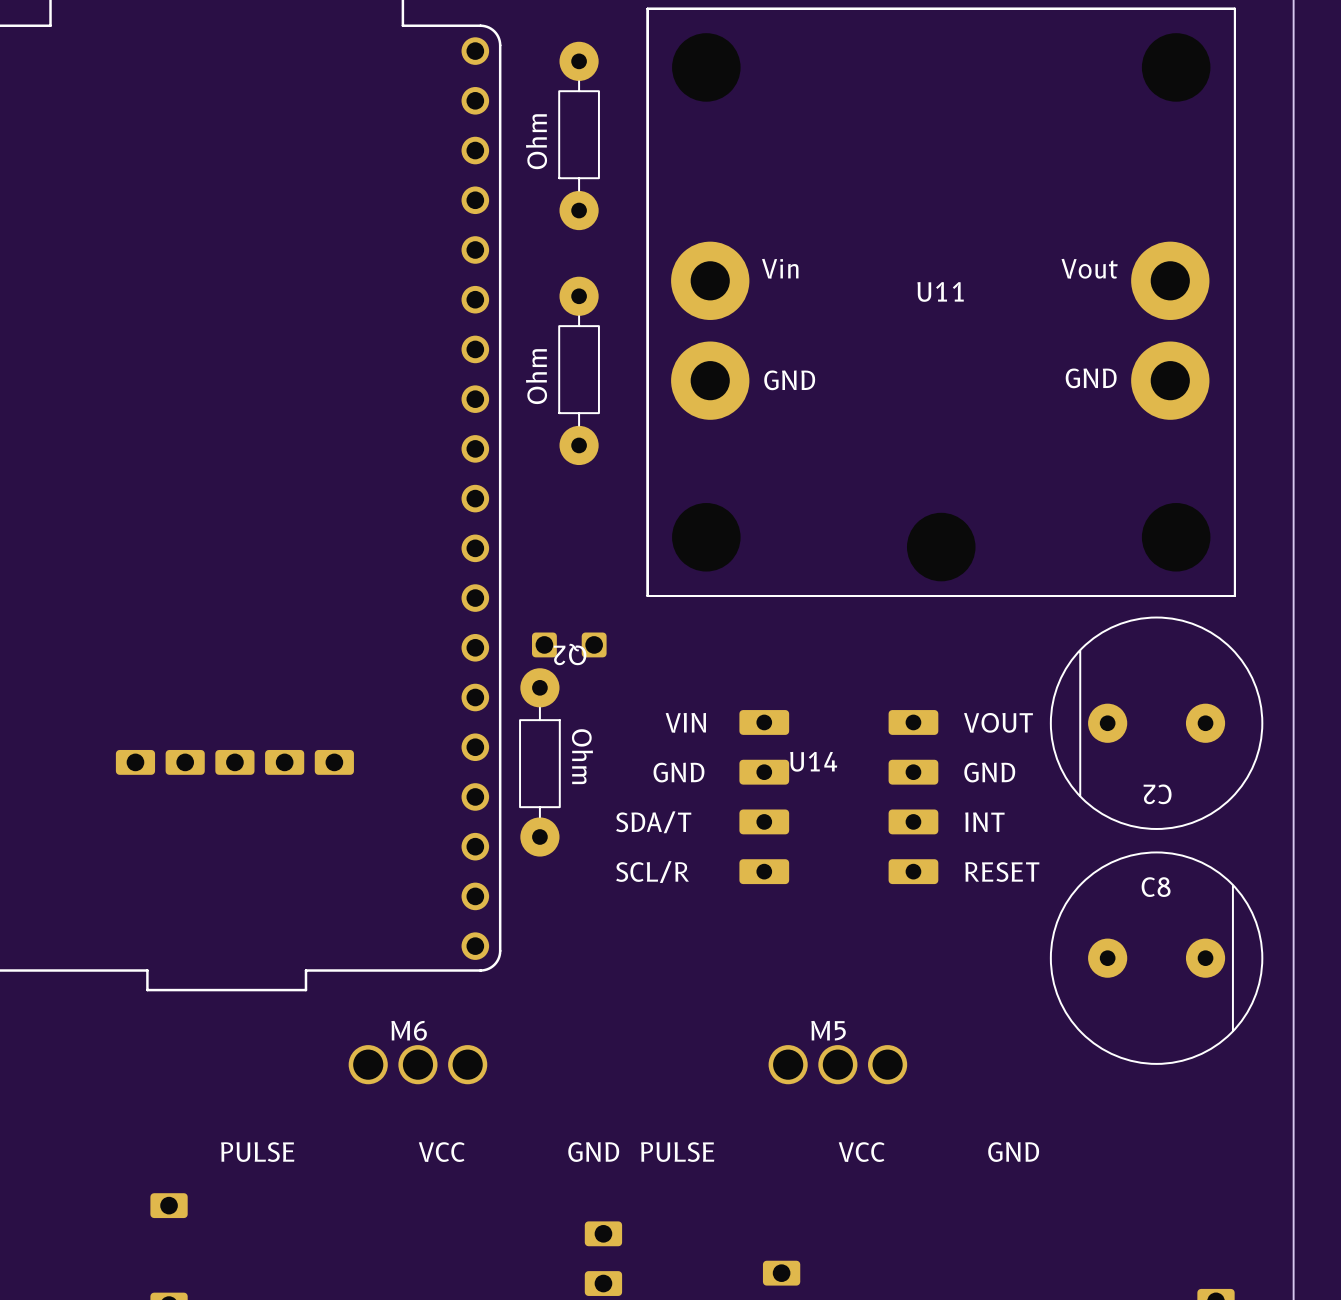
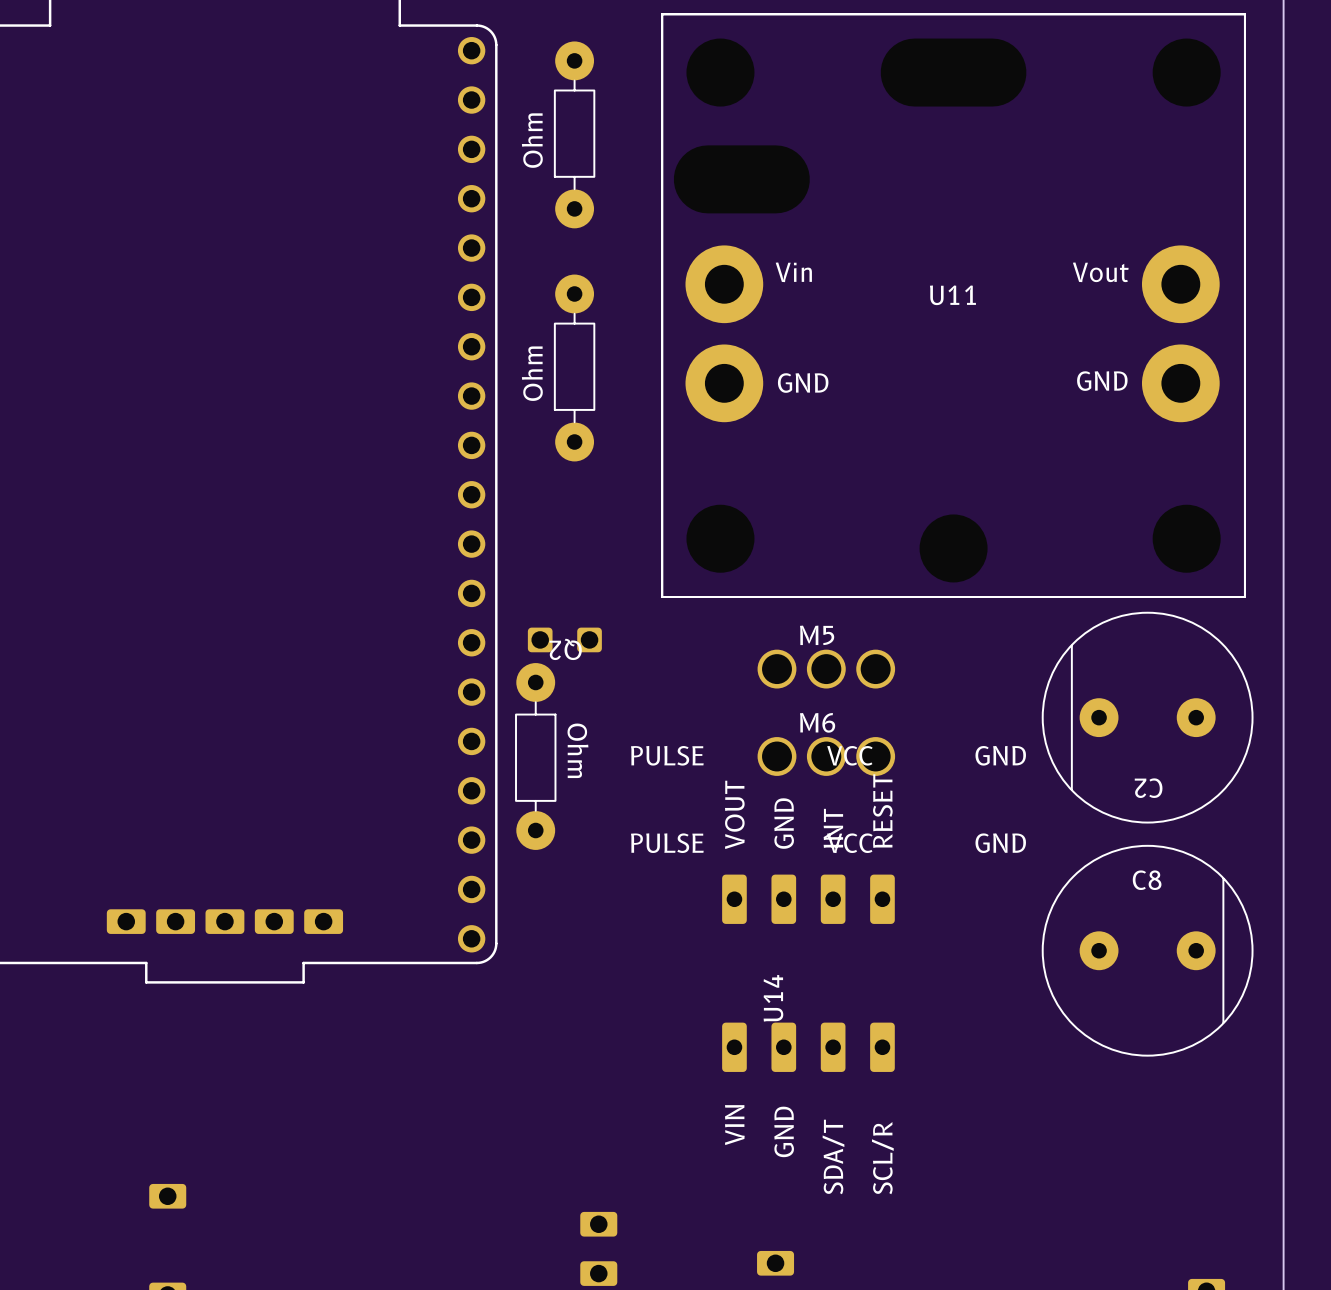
U11 footprint: [646, 7, 1236, 597] -> [661, 13, 1246, 598]
part position: (234, 762) -> (224, 921)
U14 rotation: 0° (838, 797) -> 90° counterclockwise (808, 973)
U14 position: (838, 797) -> (808, 973)
M6 position: (417, 1064) -> (826, 756)
M5 position: (837, 1064) -> (826, 669)

